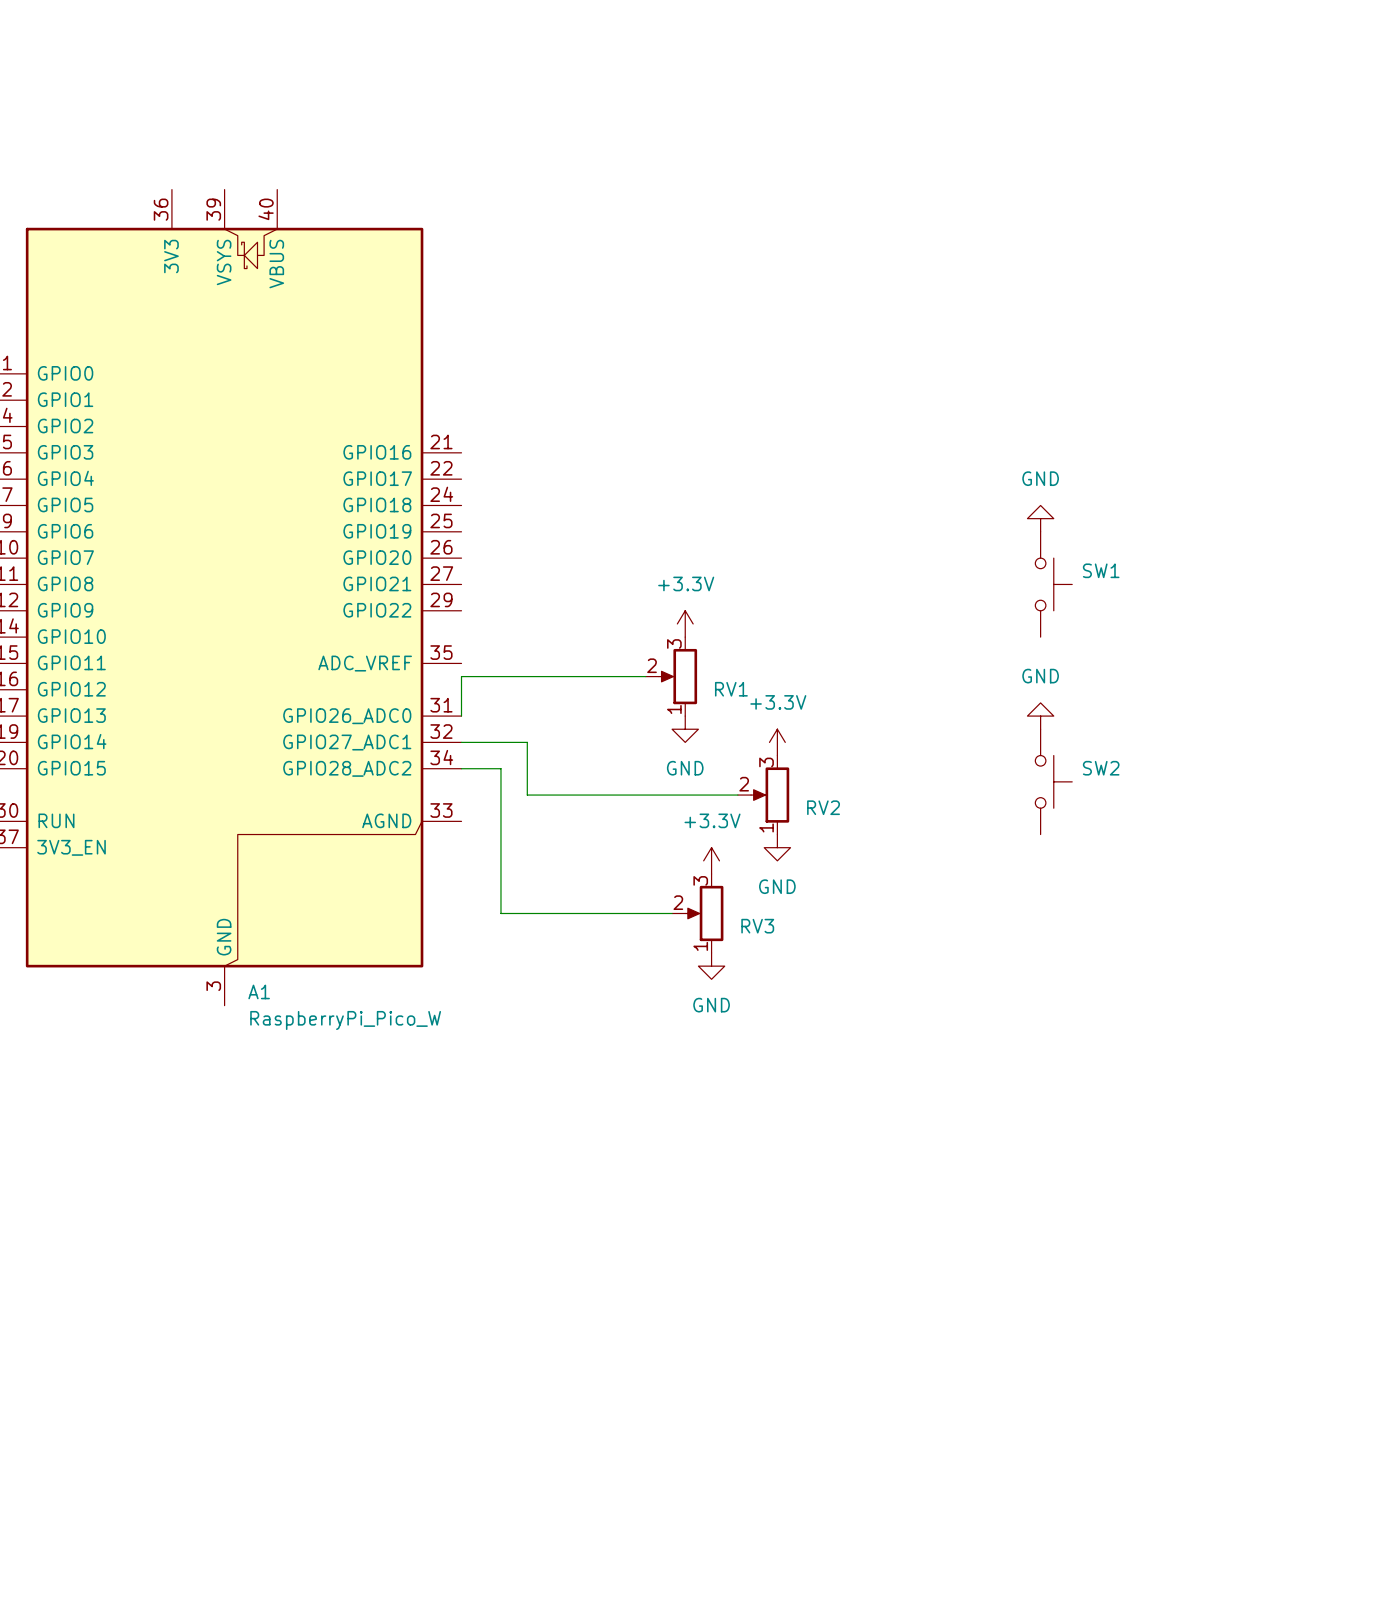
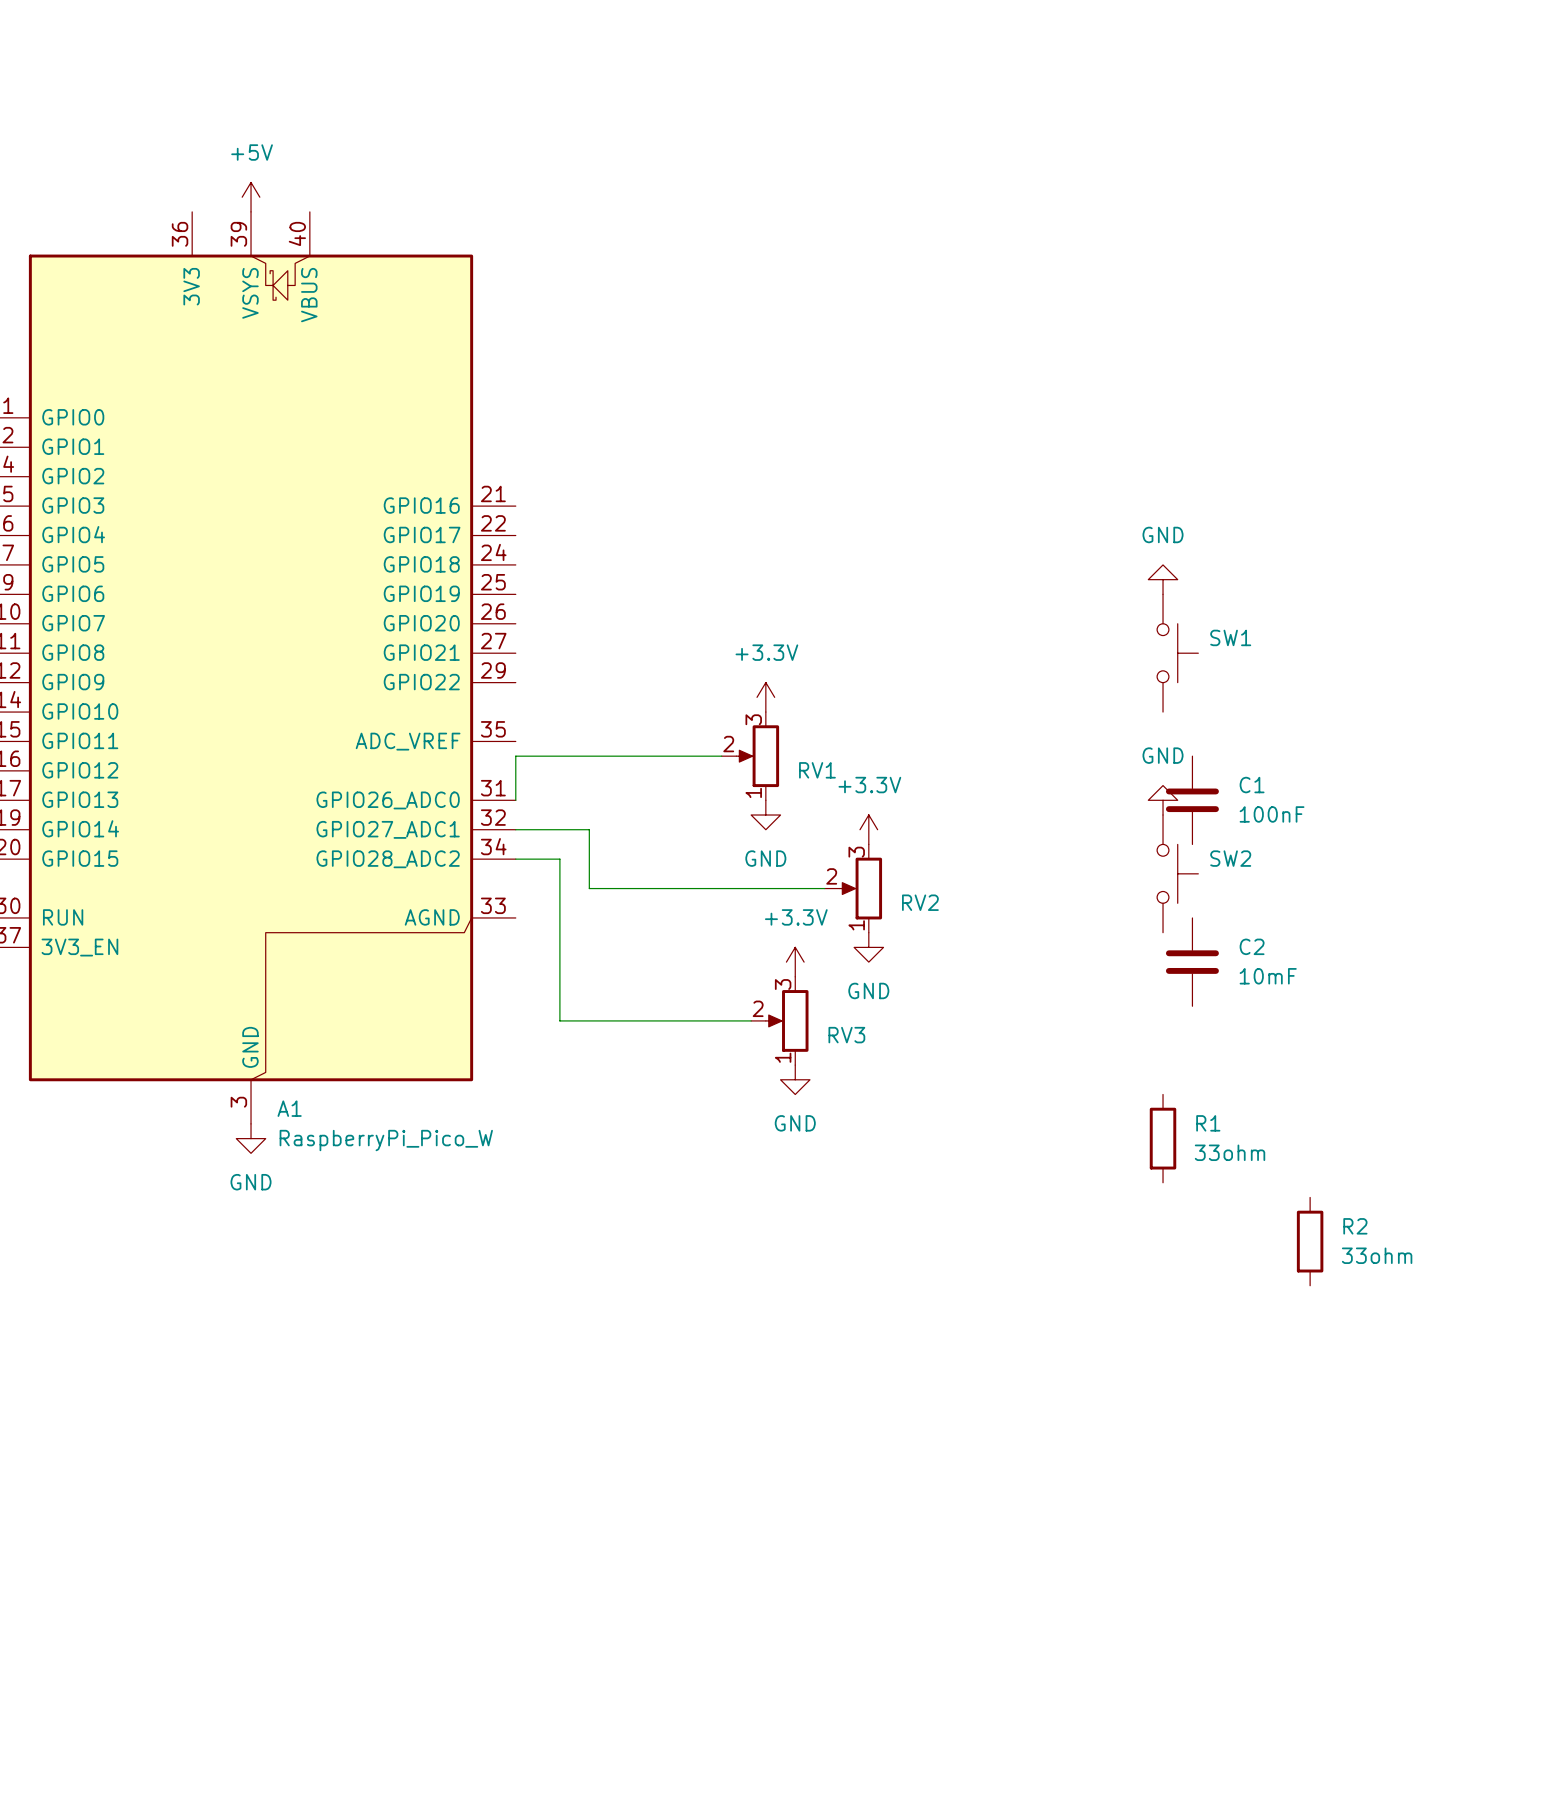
power symbol: none -> +5V (251, 197)
C1: none -> 100nF (1192, 800)
C2: none -> 10mF (1192, 962)
power symbol: none -> GND (251, 1138)
R1: none -> 33ohm (1163, 1138)
R2: none -> 33ohm (1310, 1241)

